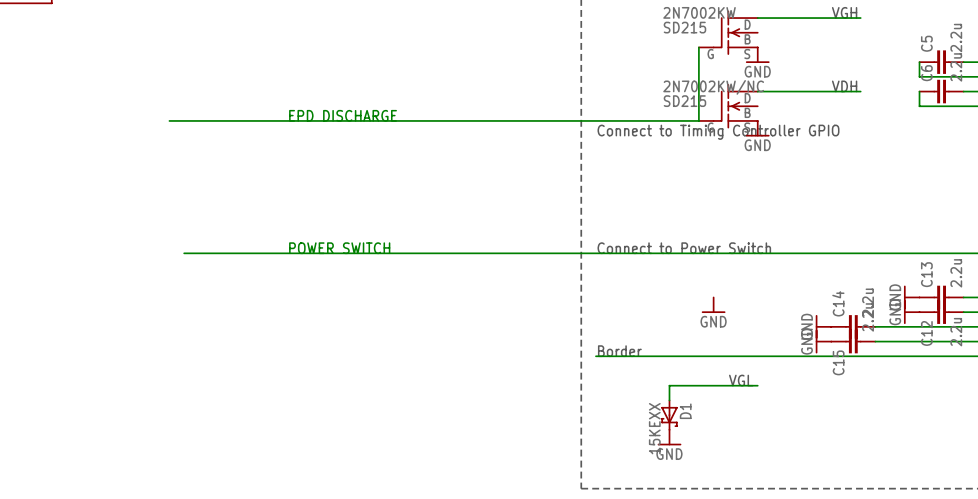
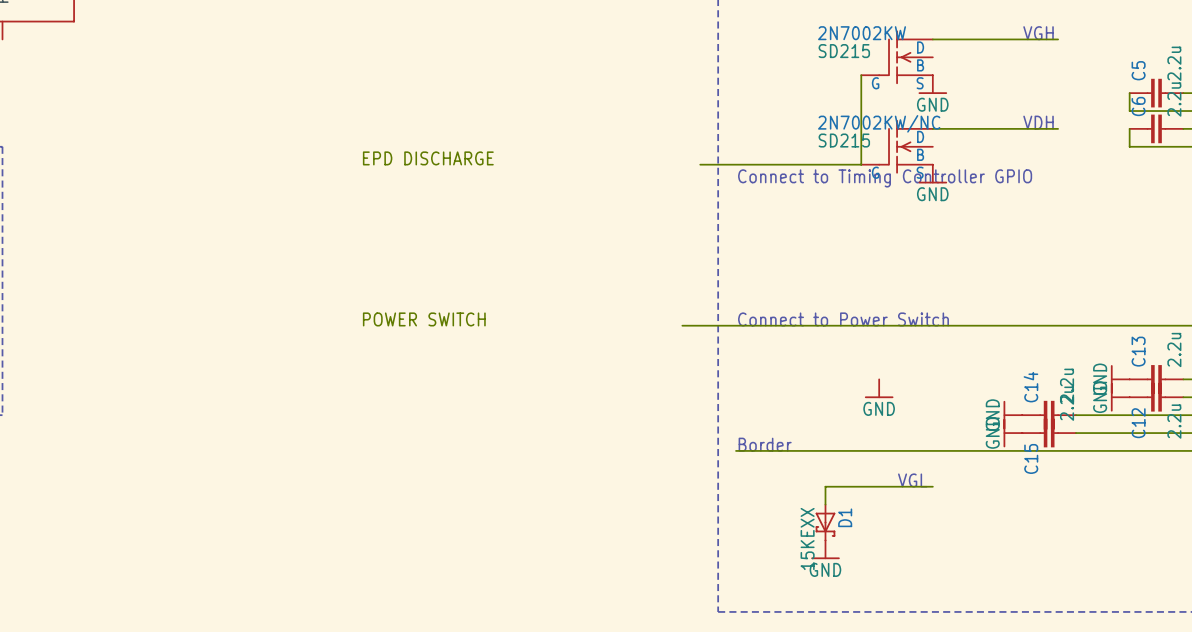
wire: (169, 120) (566, 120) -> none
wire: (184, 253) (551, 253) -> none

